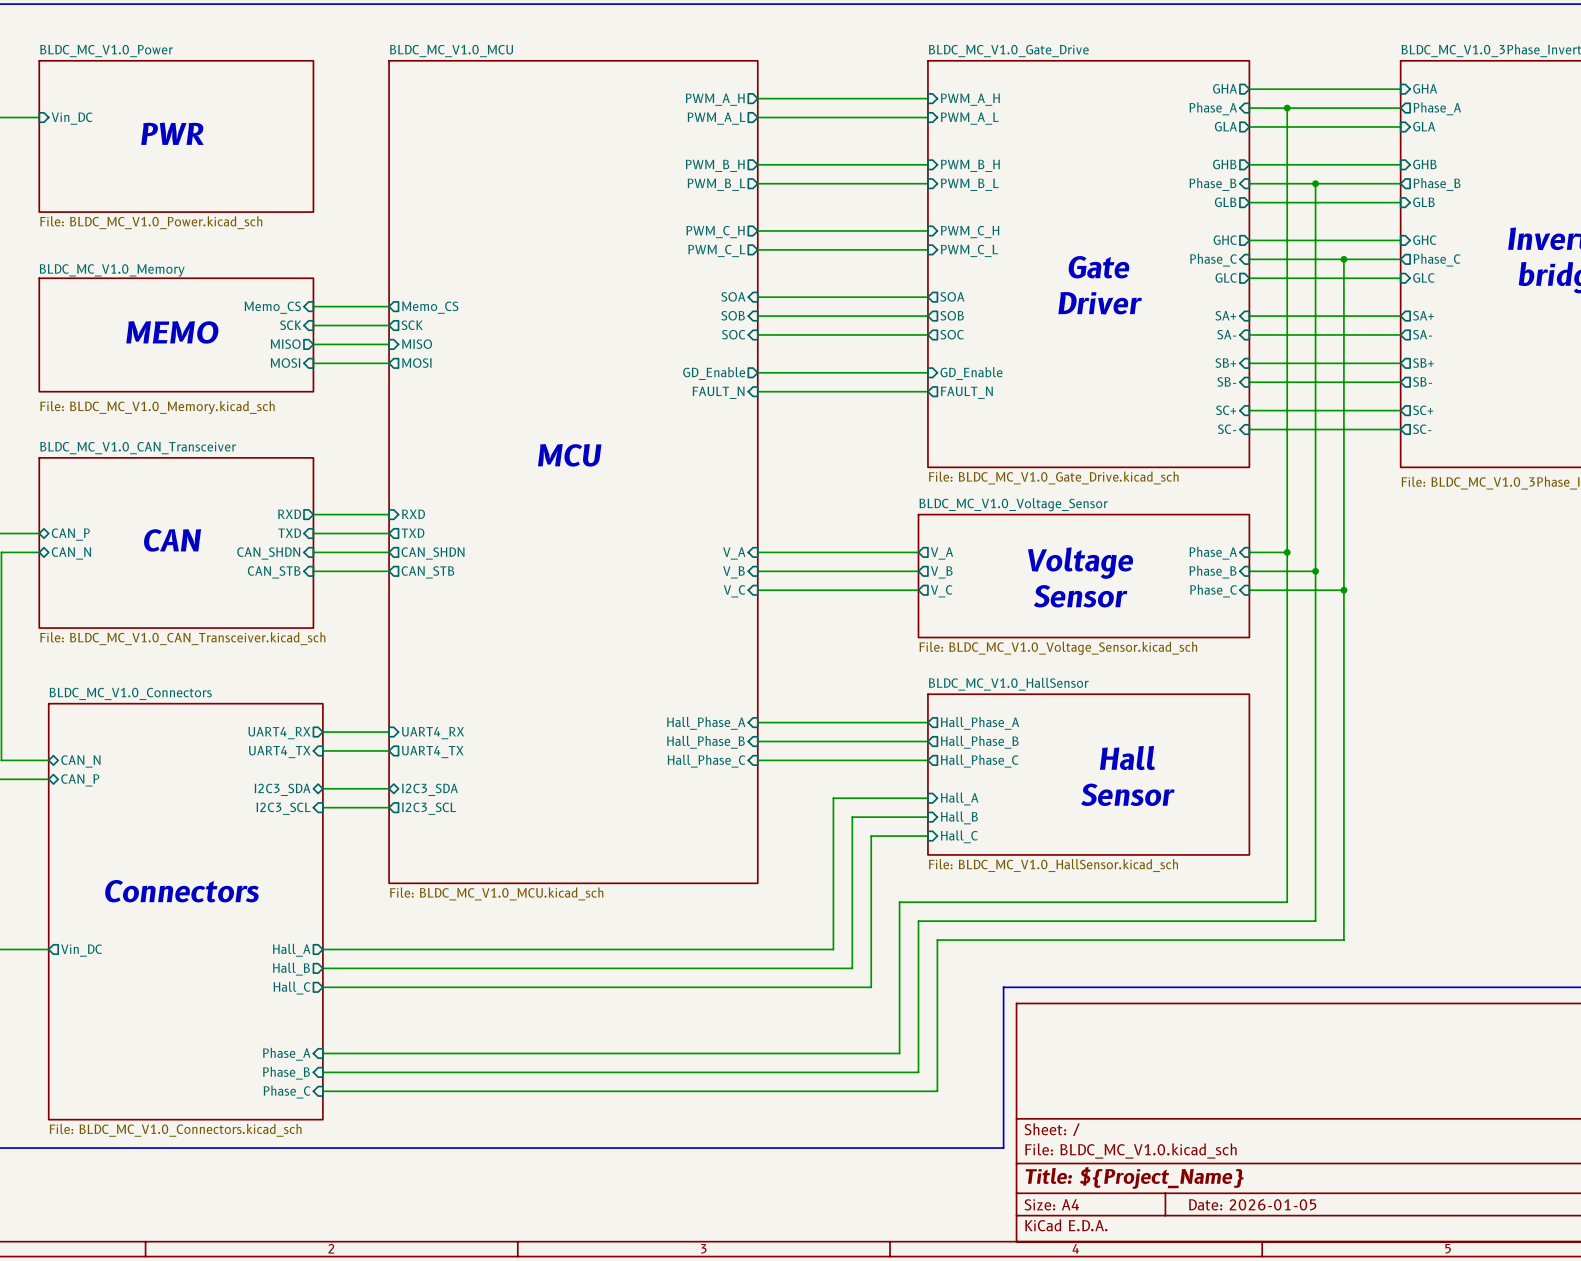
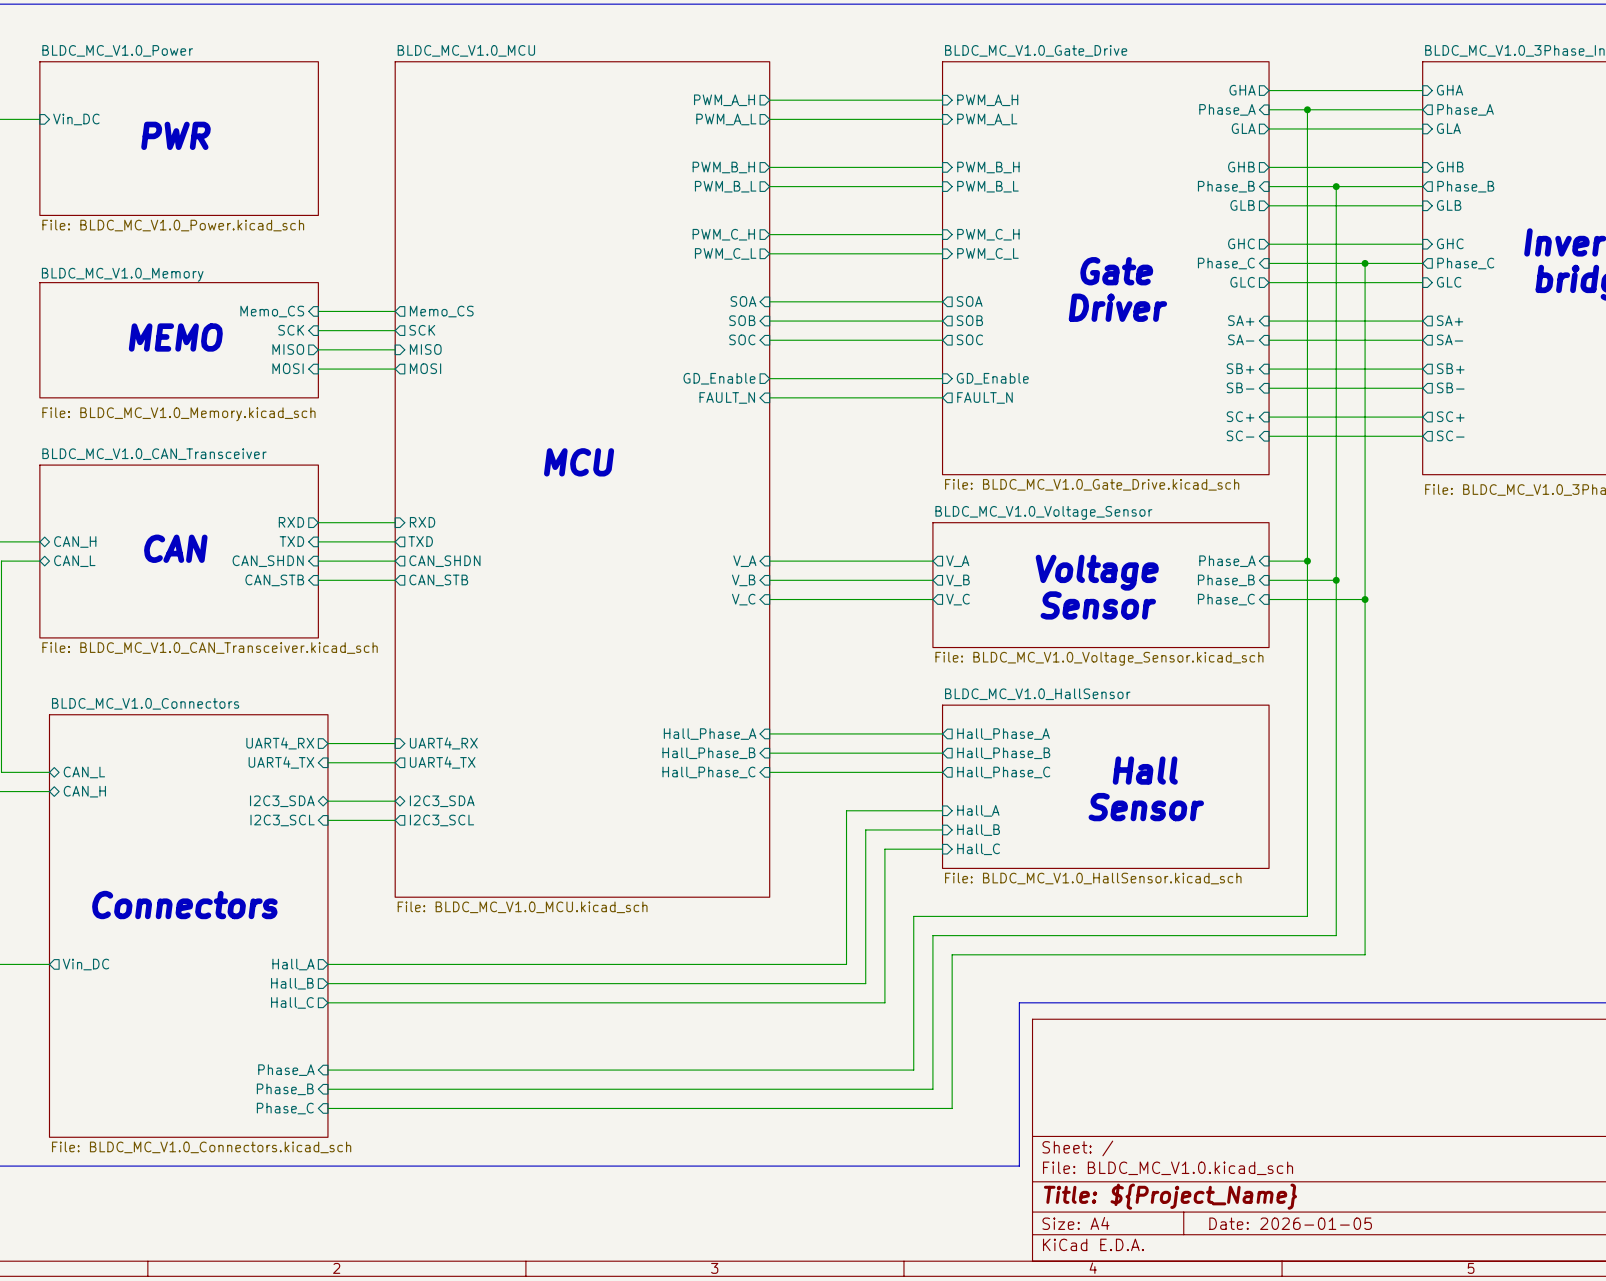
sheet pin: CAN_P (70, 534) -> CAN_H (75, 542)
sheet pin: CAN_N (71, 553) -> CAN_L (74, 561)
sheet pin: CAN_N (80, 761) -> CAN_L (84, 772)
sheet pin: CAN_P (80, 780) -> CAN_H (84, 791)

